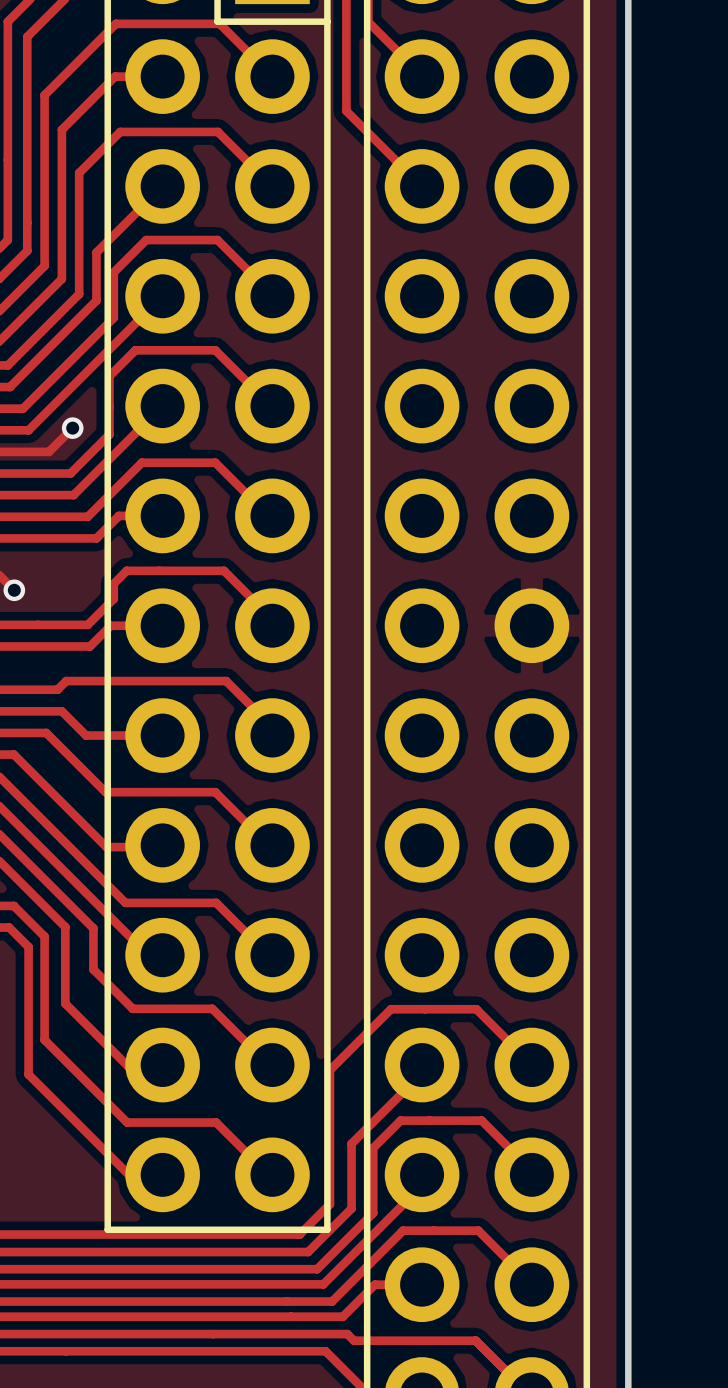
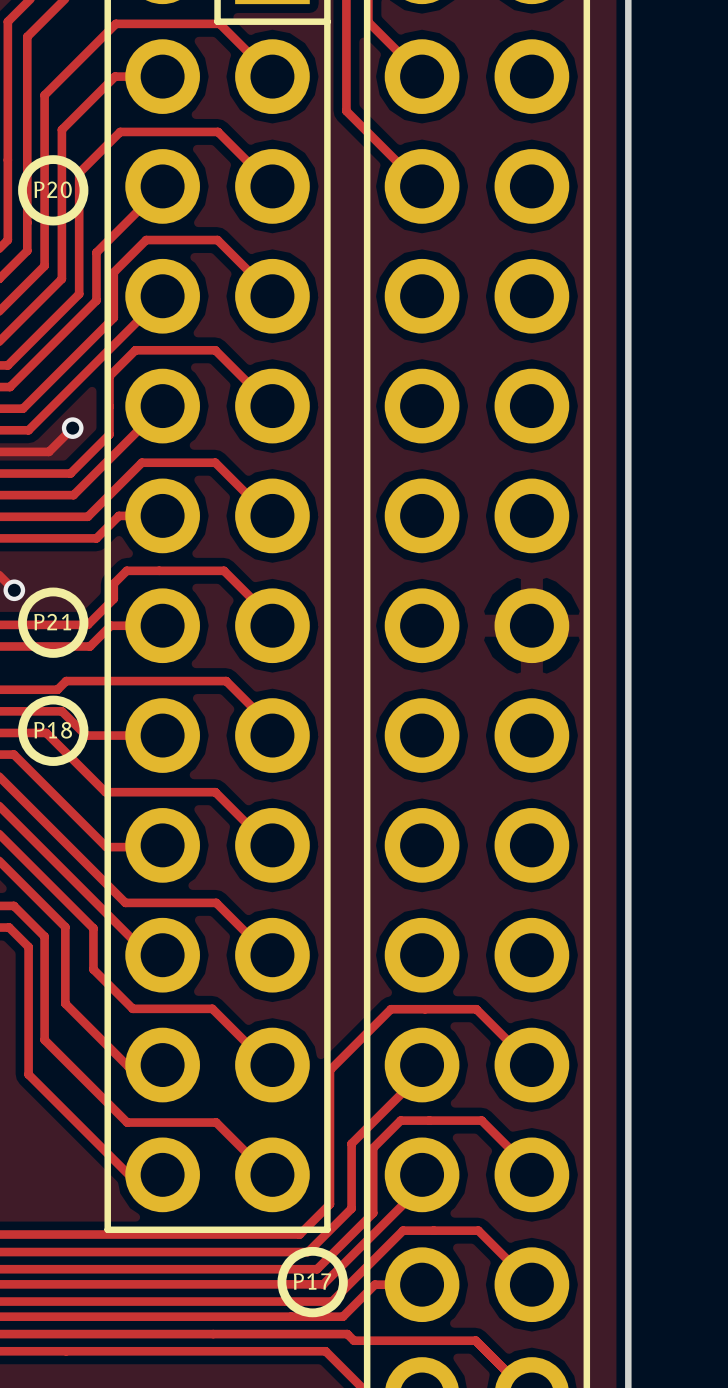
P20: none -> (53, 190)
P21: none -> (53, 622)
P18: none -> (53, 730)
P17: none -> (312, 1282)

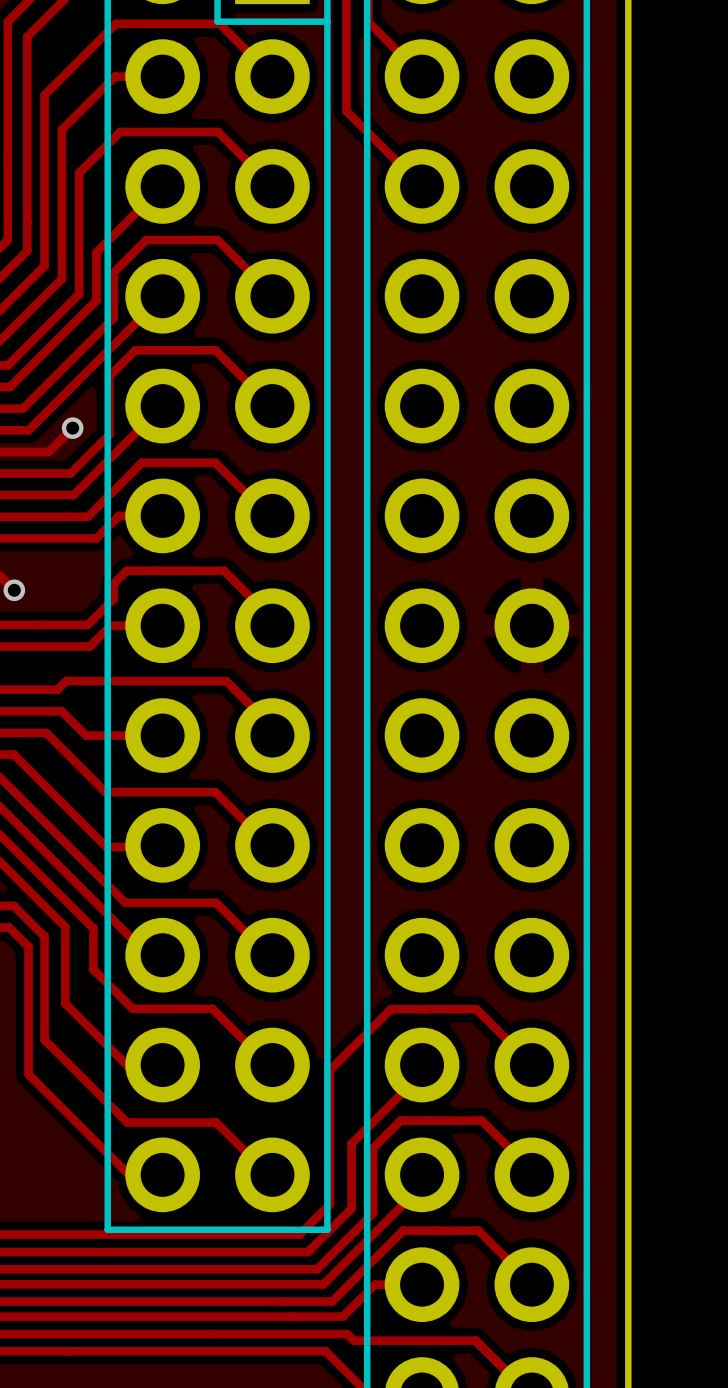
P20: (53, 190) -> none
P21: (53, 622) -> none
P18: (53, 730) -> none
P17: (312, 1282) -> none

